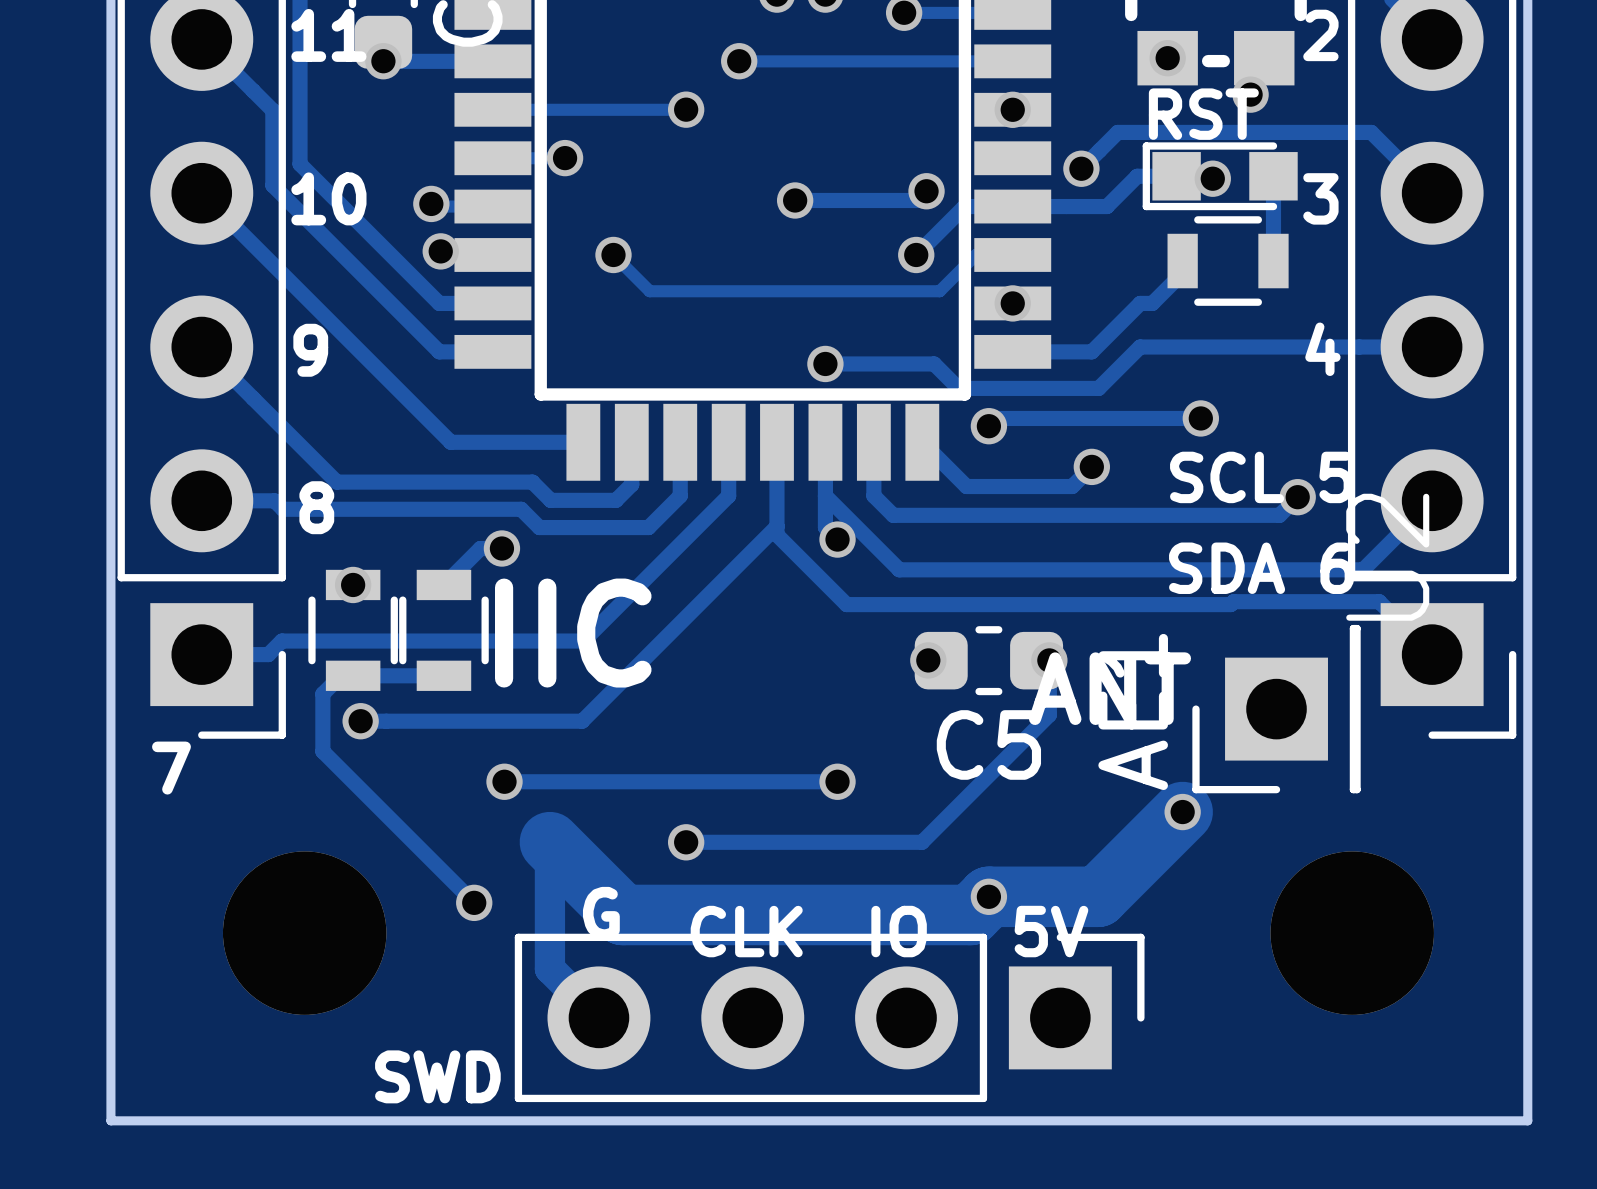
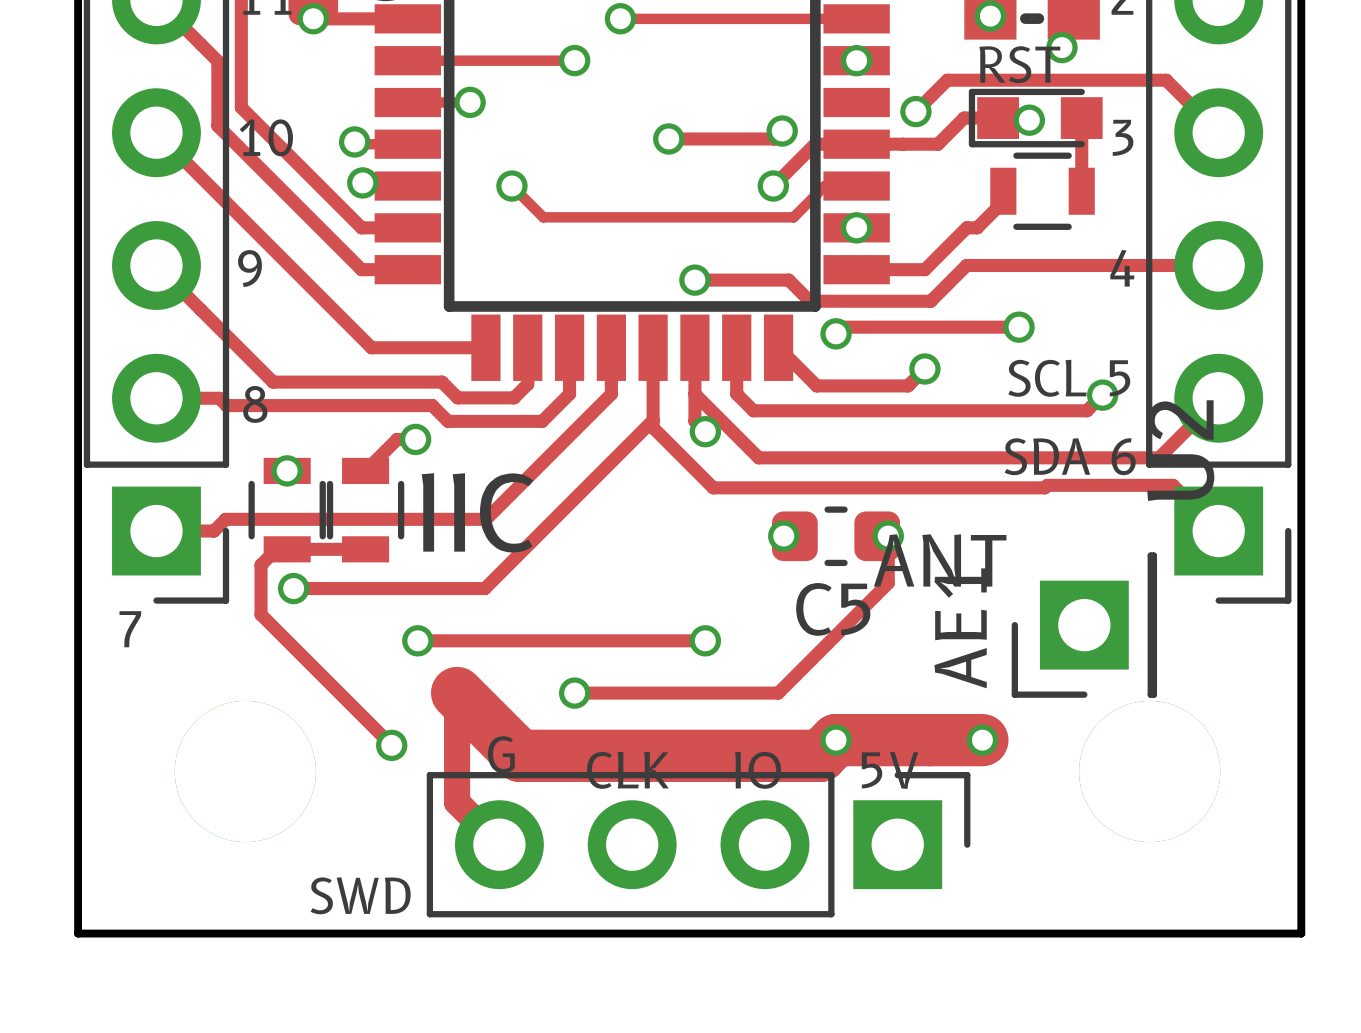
AE1 position: (1276, 709) -> (1084, 625)
track: (1182, 812) (1097, 896) -> (982, 740) (930, 740)
via position: (1182, 812) -> (982, 740)

